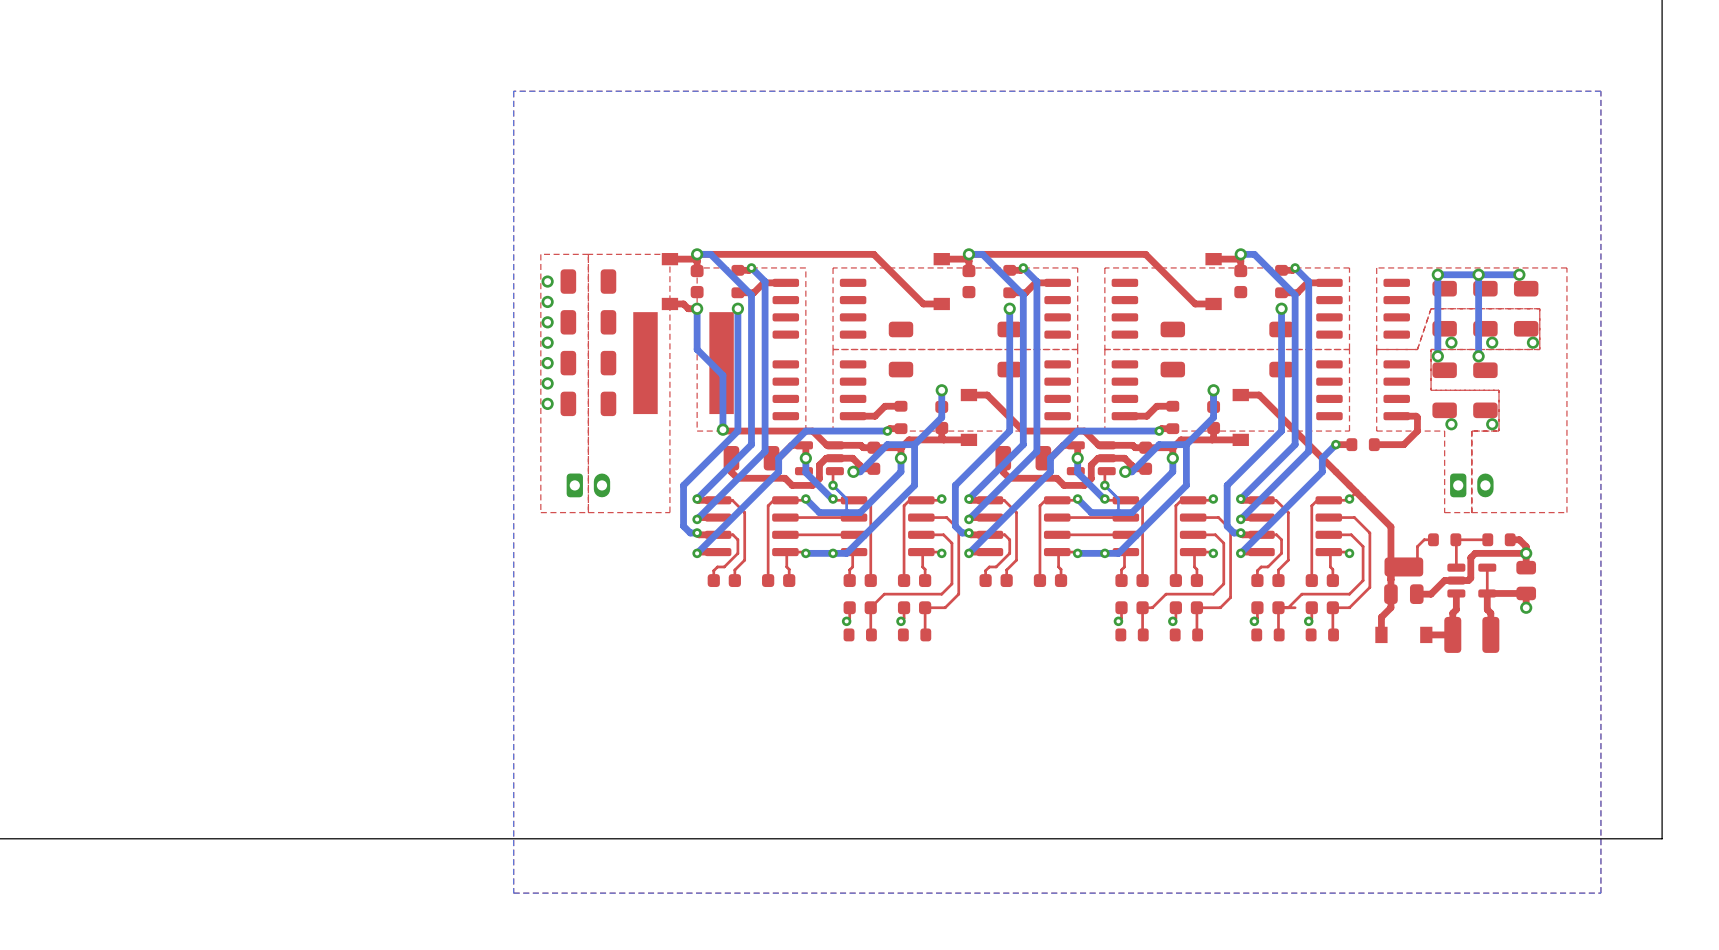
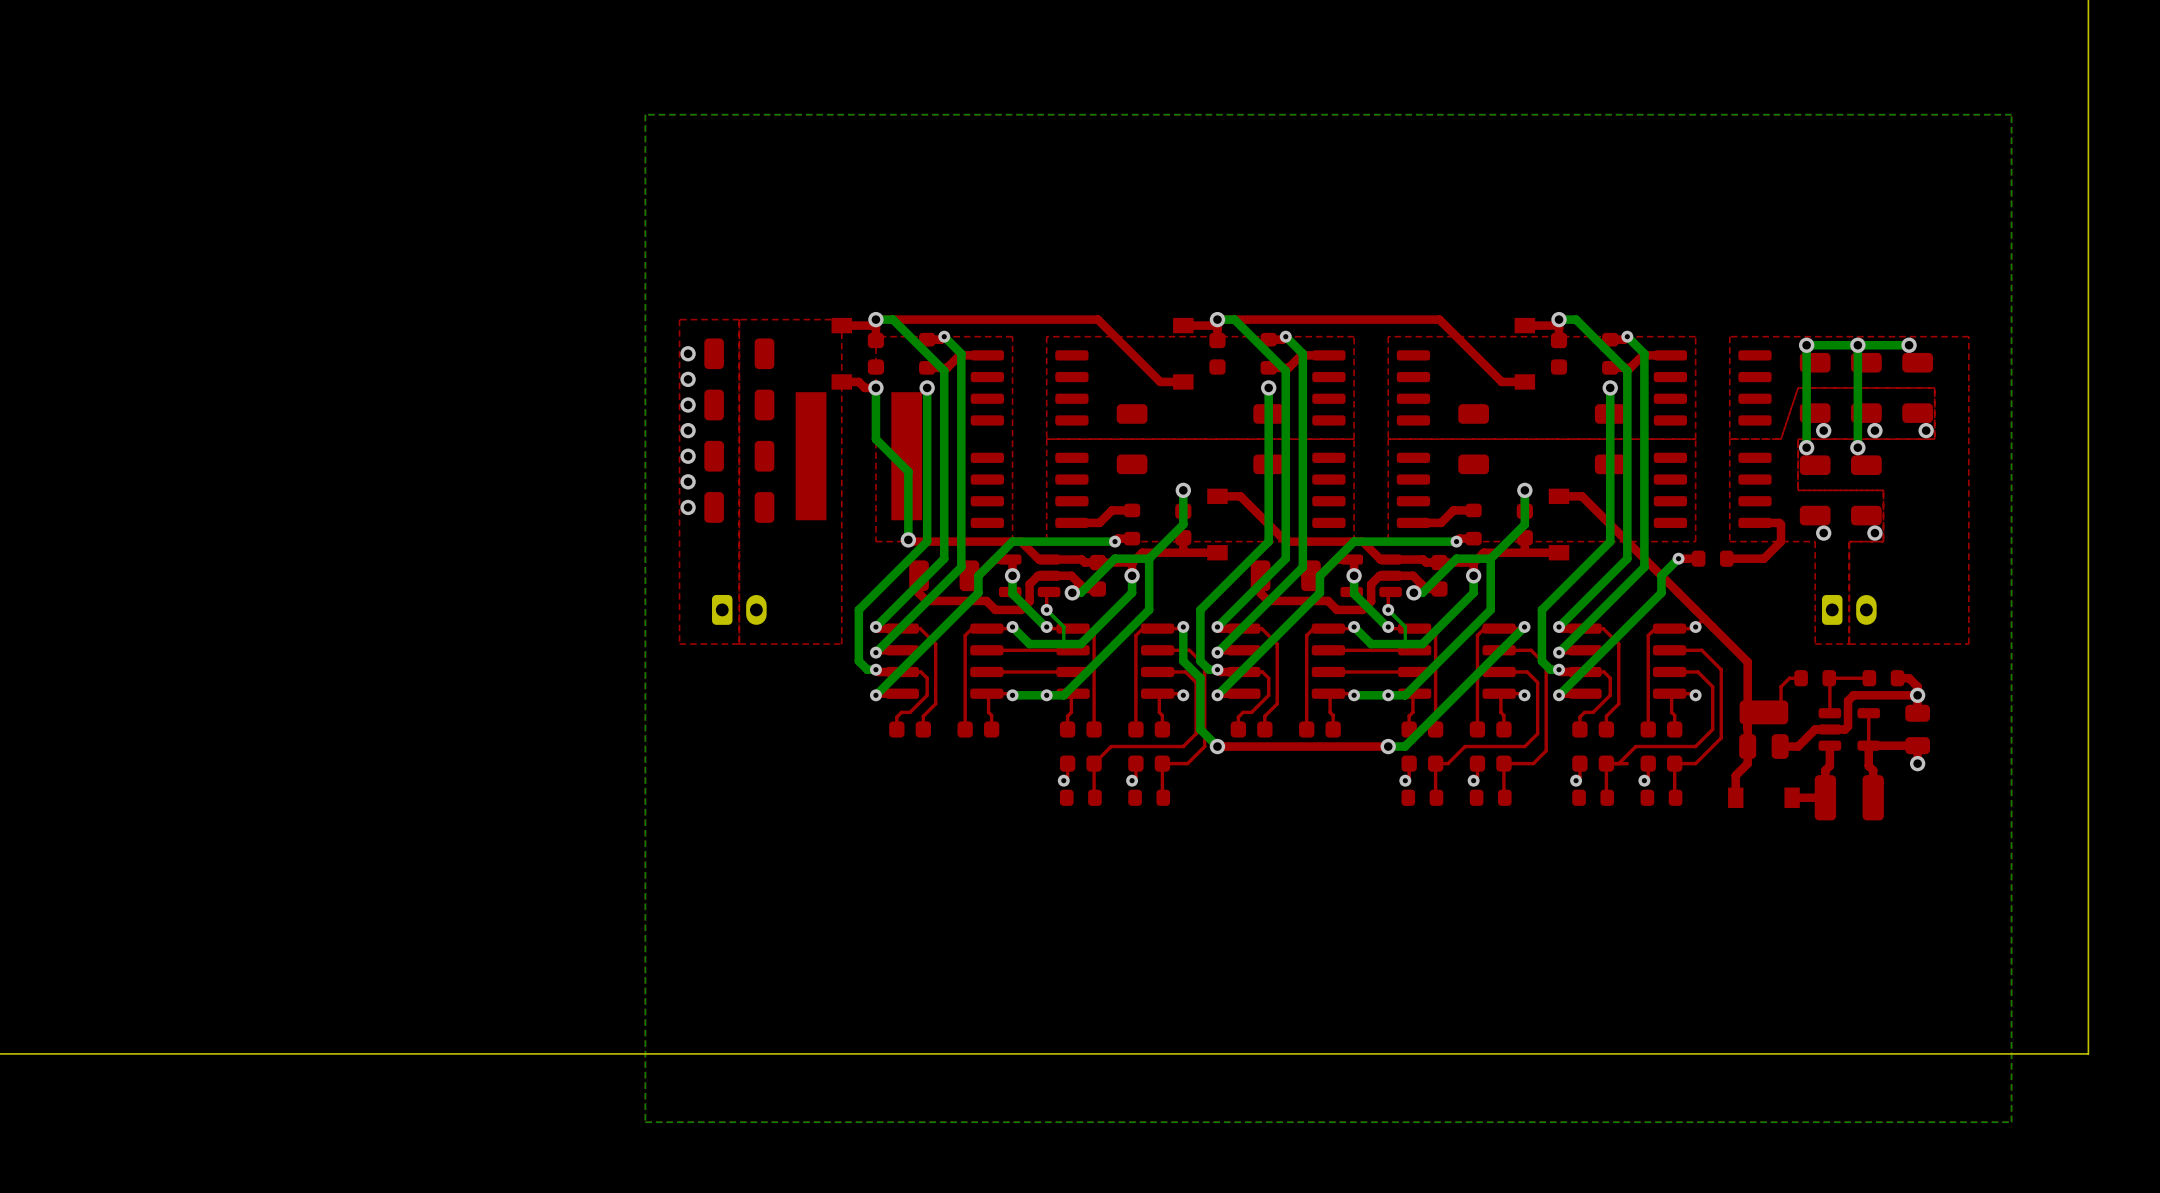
bottom track: none -> (1183, 627) (1183, 661) (1200, 678) (1200, 729) (1217, 746)
bottom track: none -> (1524, 627) (1404, 746) (1388, 746)
via: none -> (1217, 746)
top track: none -> (1388, 746) (1217, 746)
via: none -> (1388, 746)

